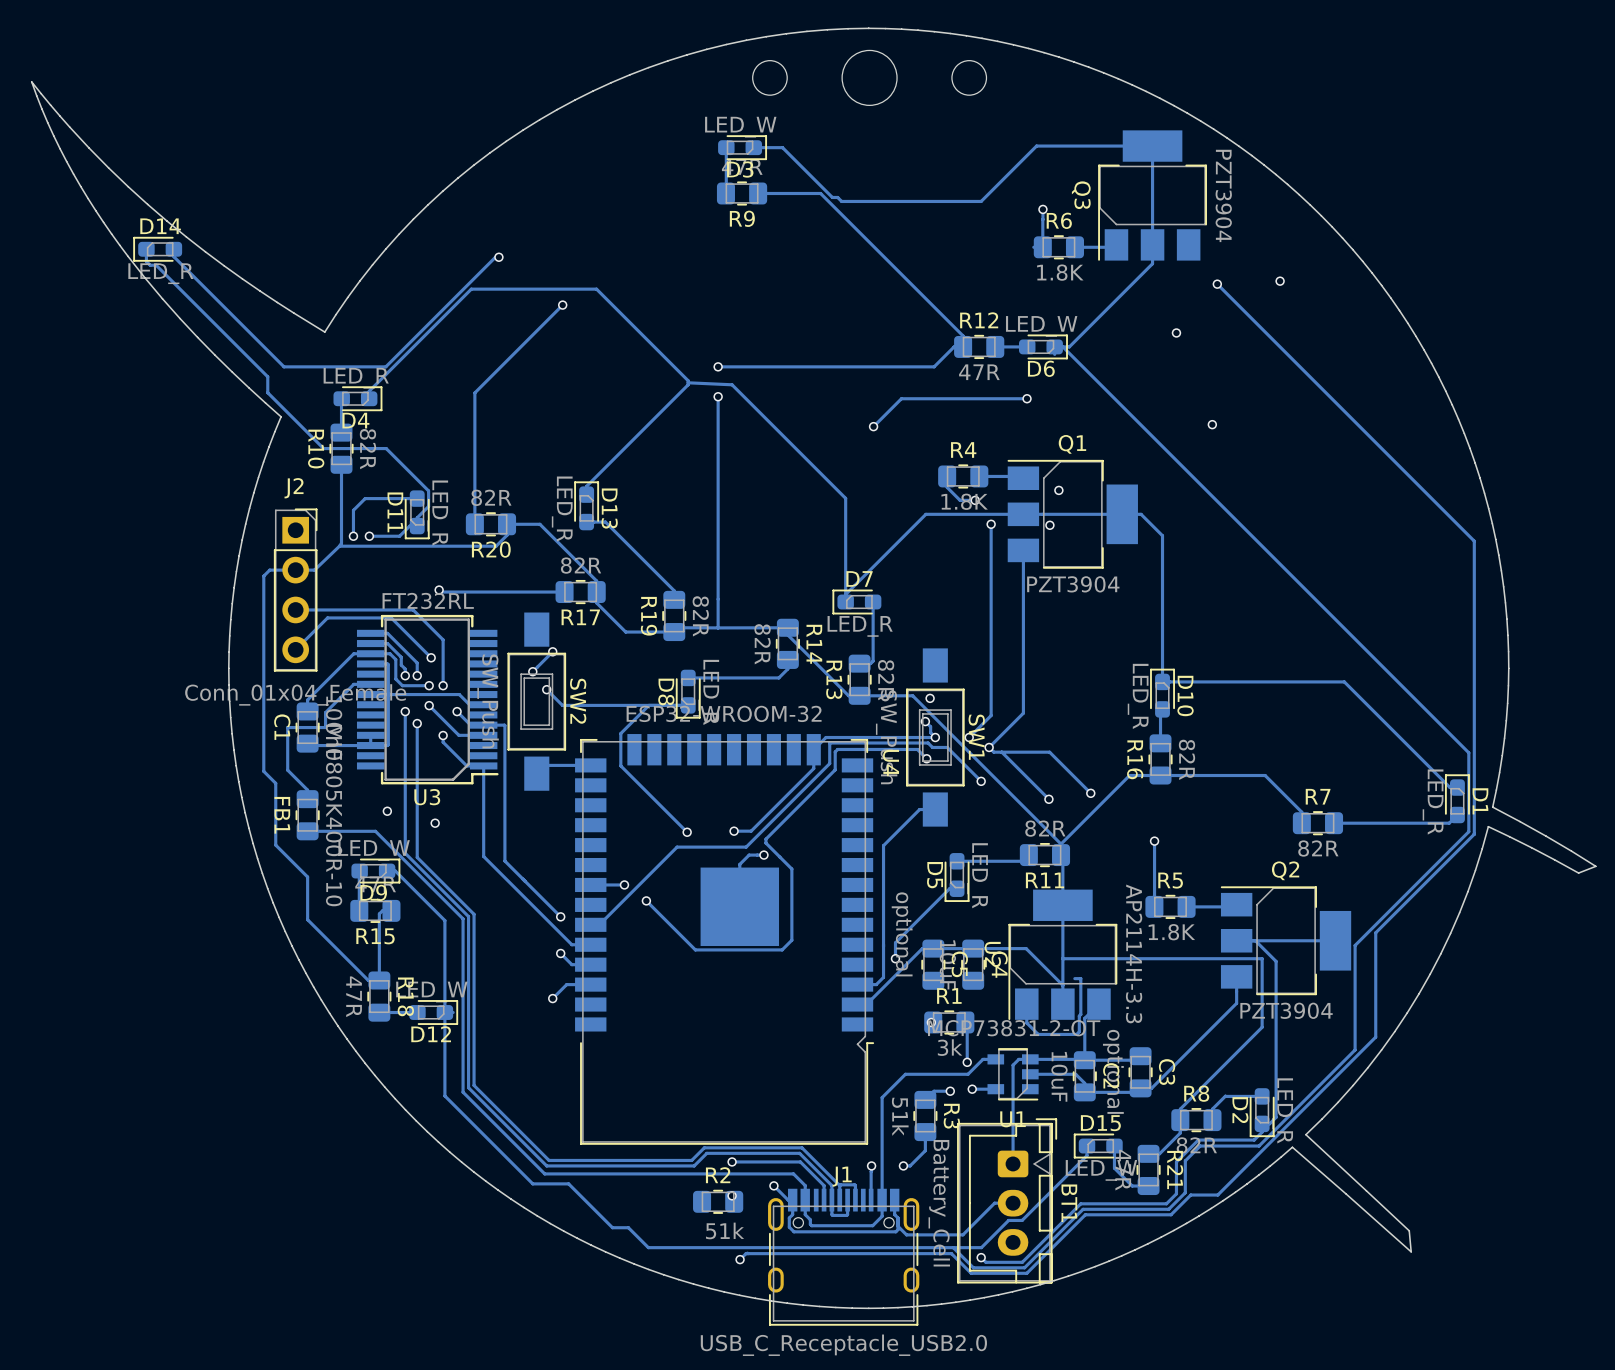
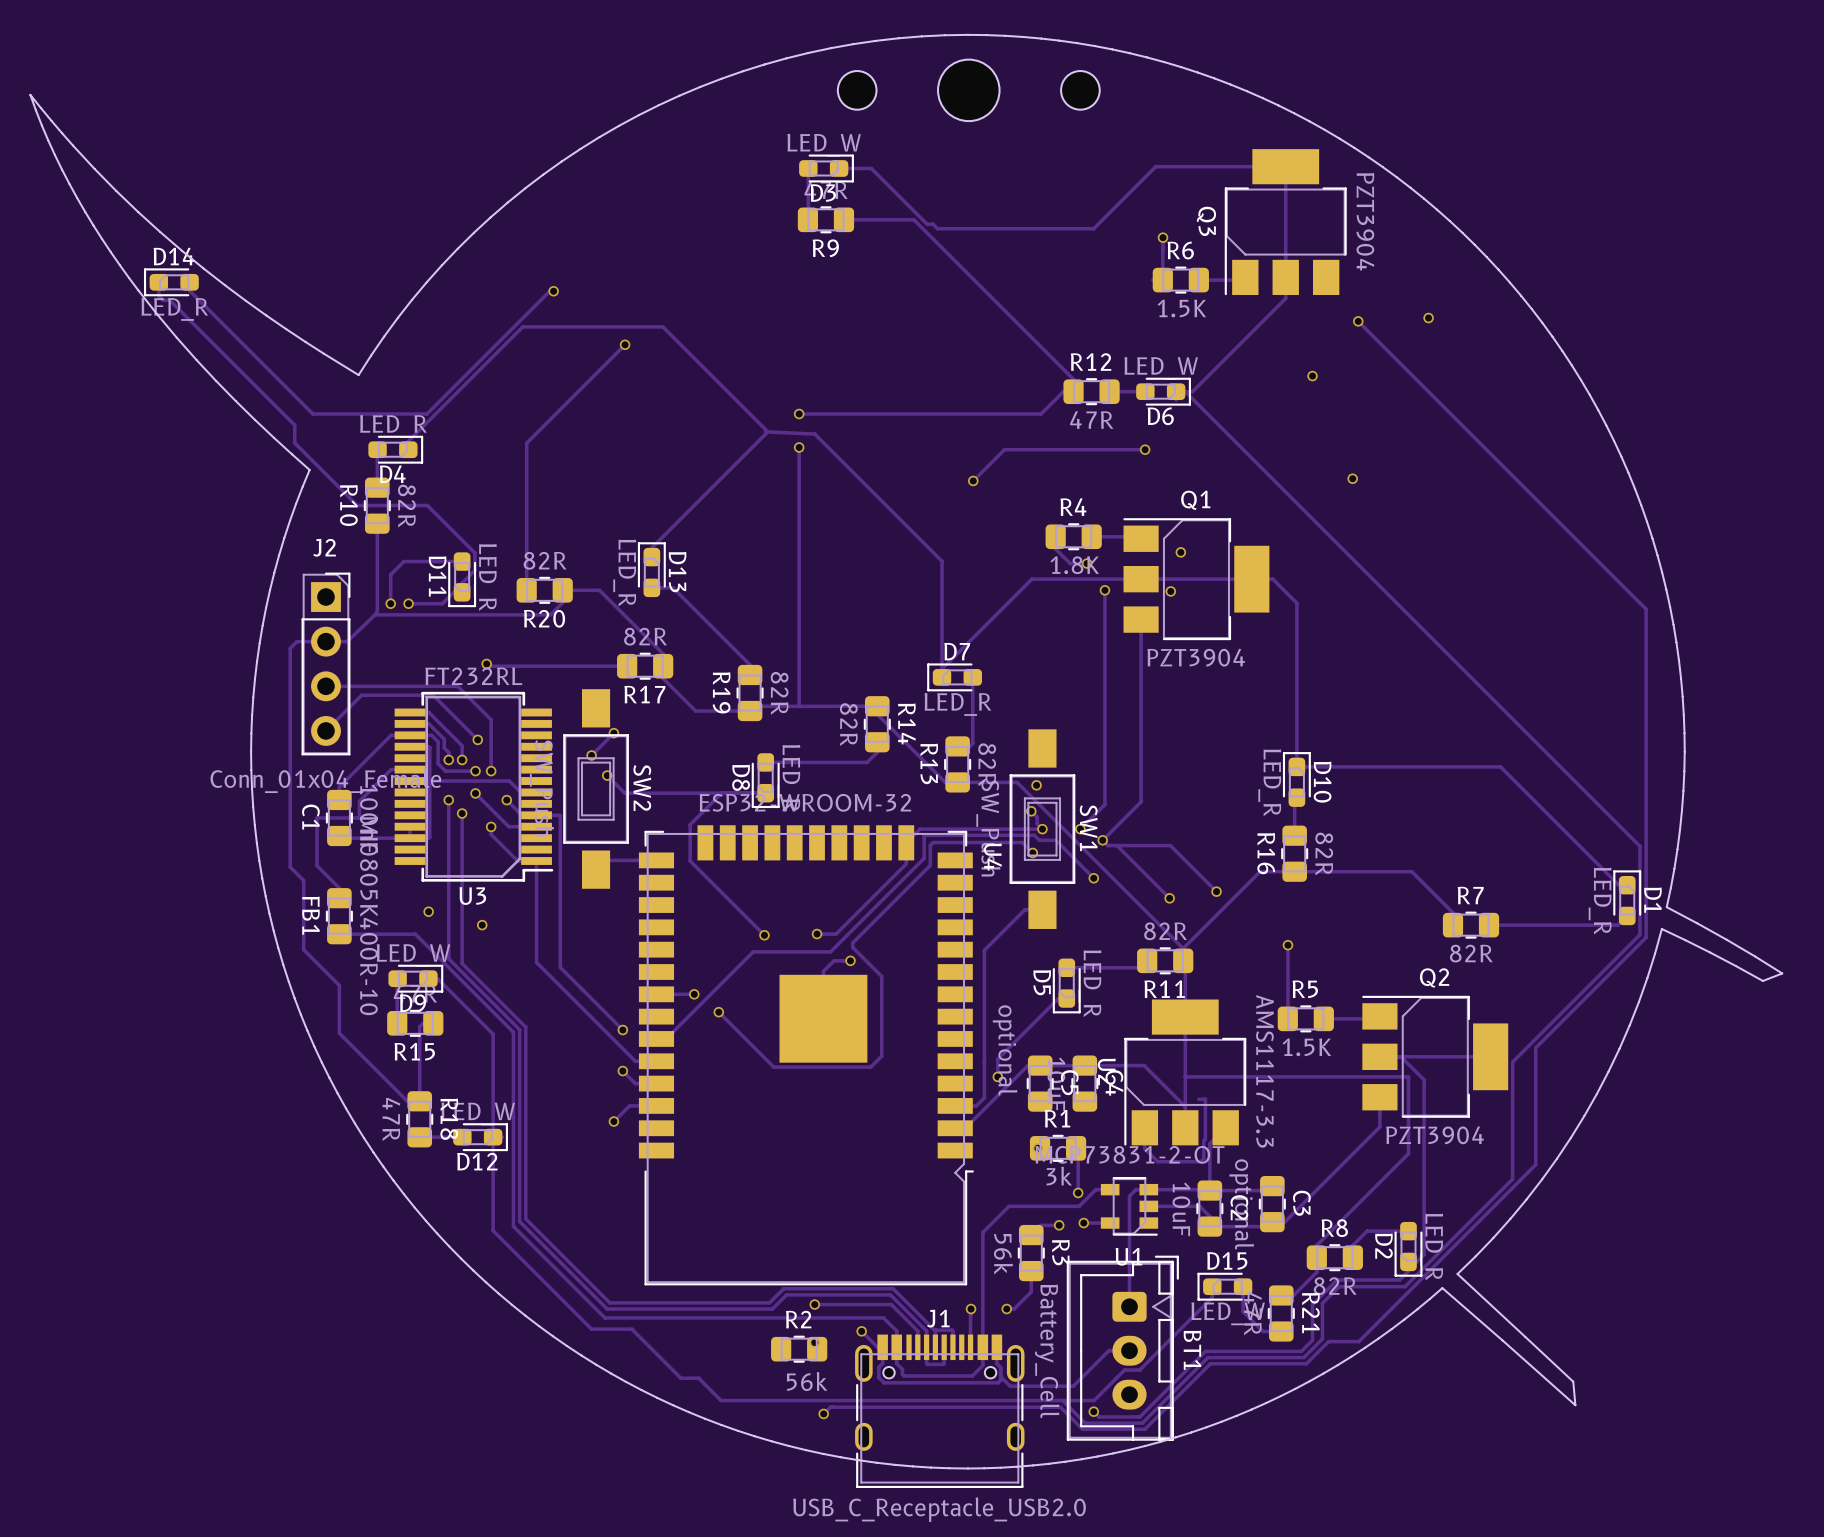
R6 value: 1.8K (1060, 272) -> 1.5K (1181, 308)
R5 value: 1.8K (1171, 932) -> 1.5K (1306, 1047)
U2 value: AP2114H-3.3 (1134, 953) -> AMS1117-3.3 (1264, 1071)
R3 value: 51k (900, 1116) -> 56k (1003, 1254)
R2 value: 51k (725, 1230) -> 56k (807, 1381)

